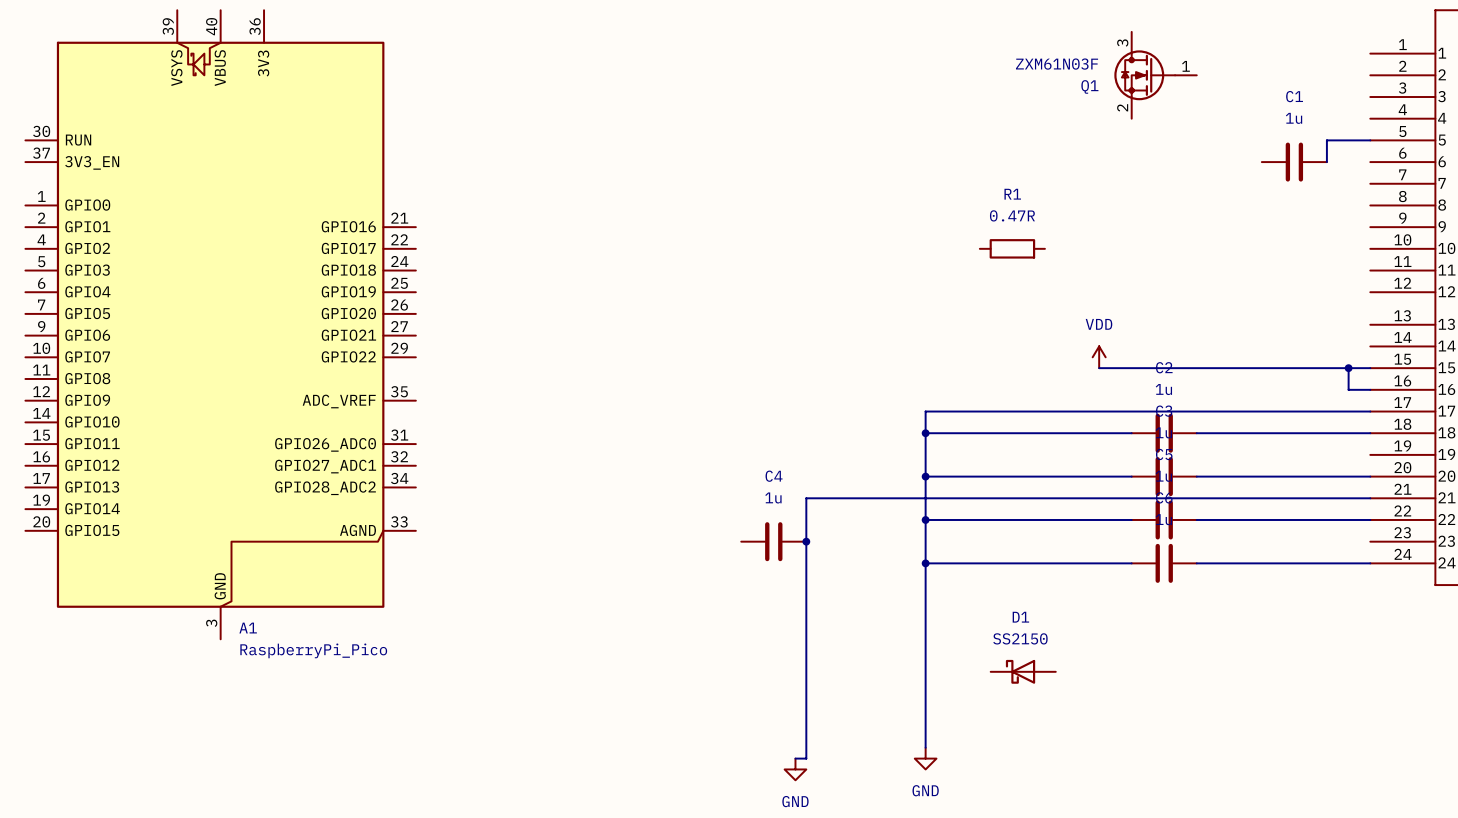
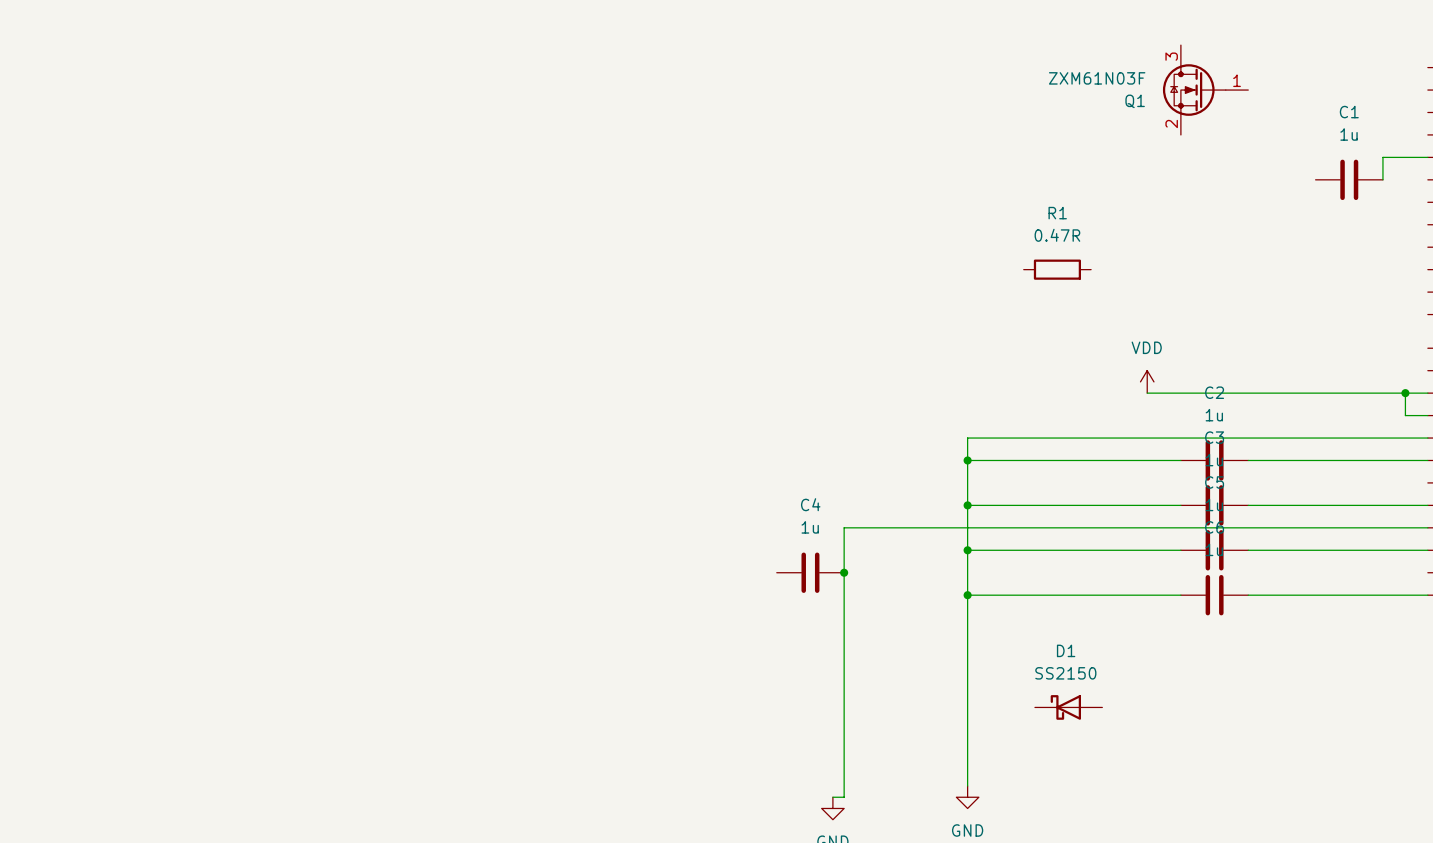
A1: RaspberryPi_Pico (220, 324) -> none

